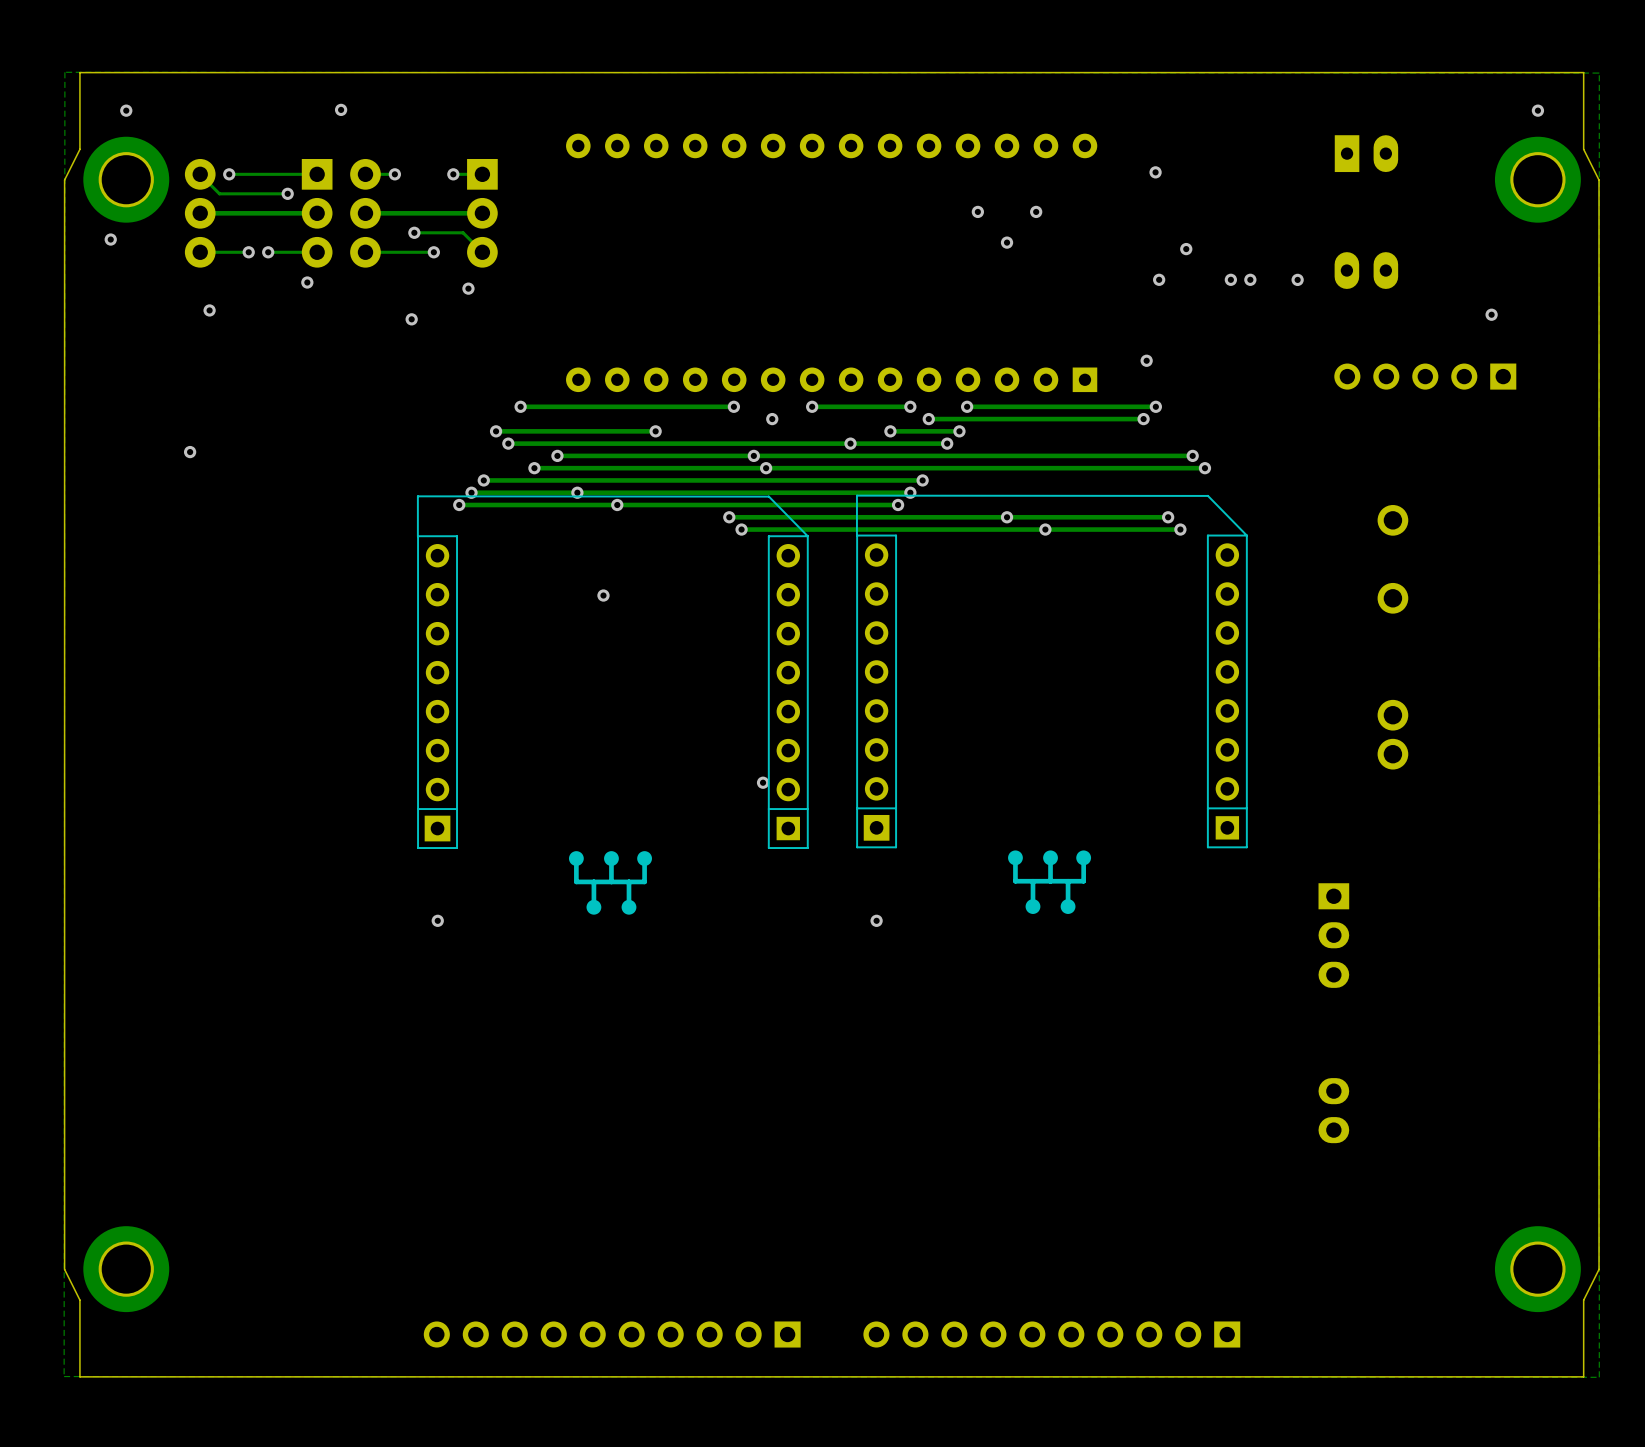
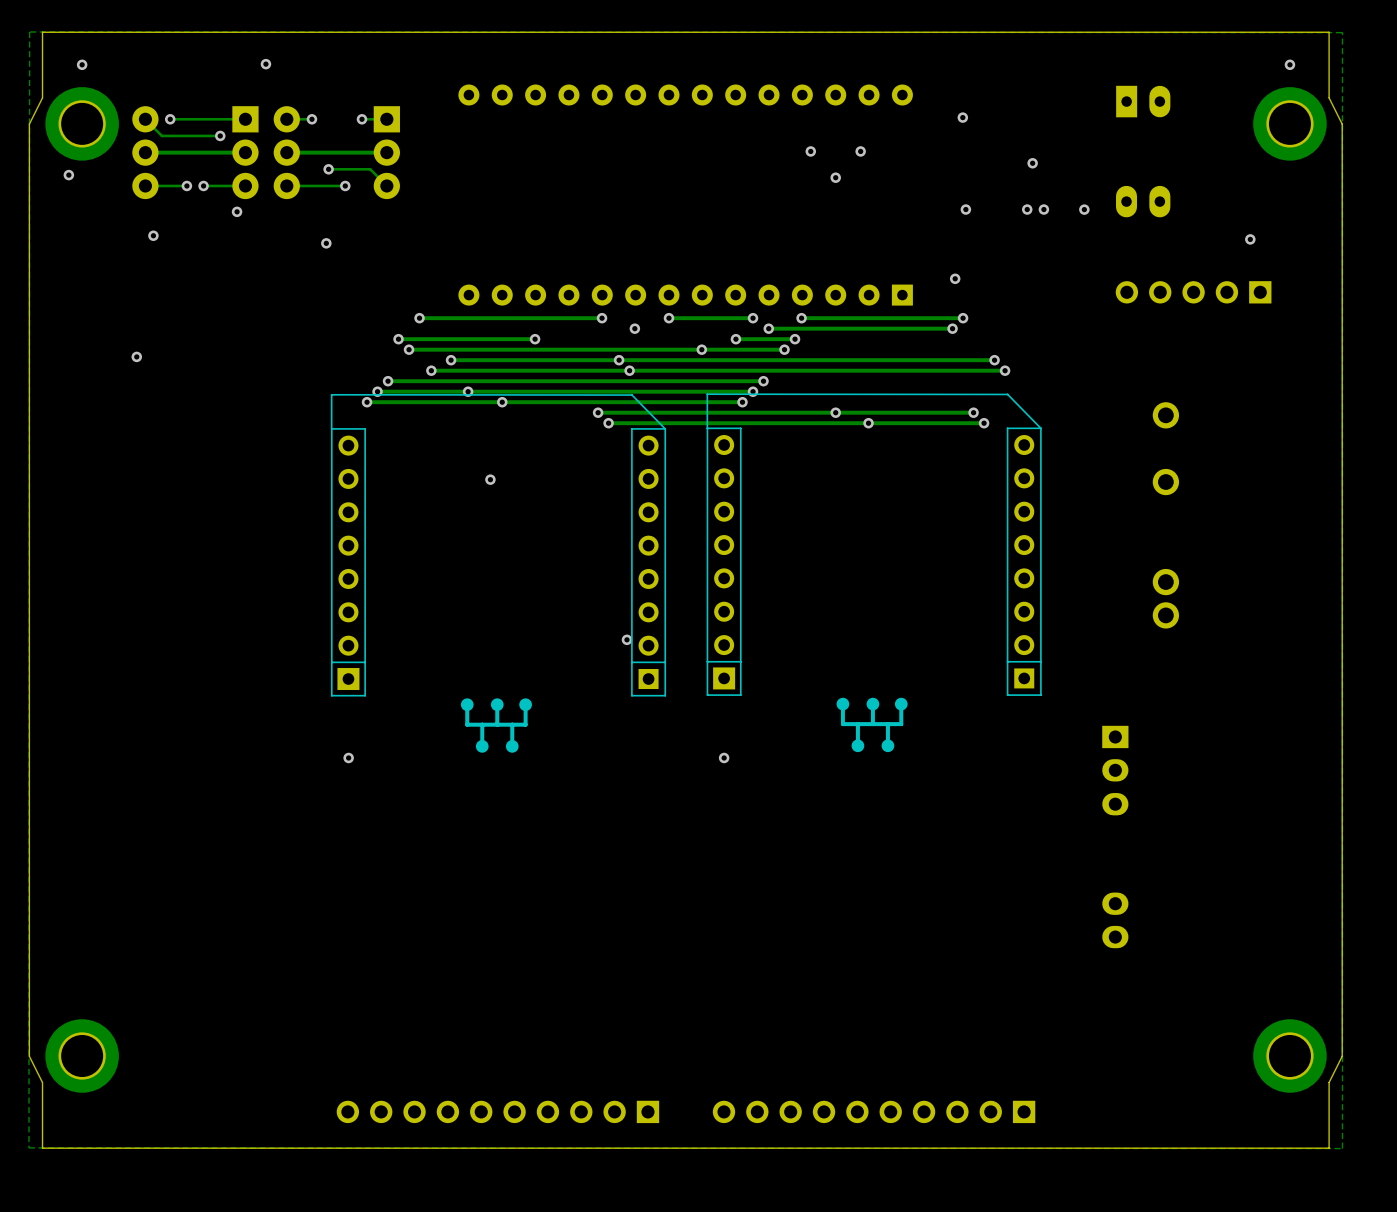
via position: (1186, 249) -> (1032, 163)
via: (468, 288) -> none

